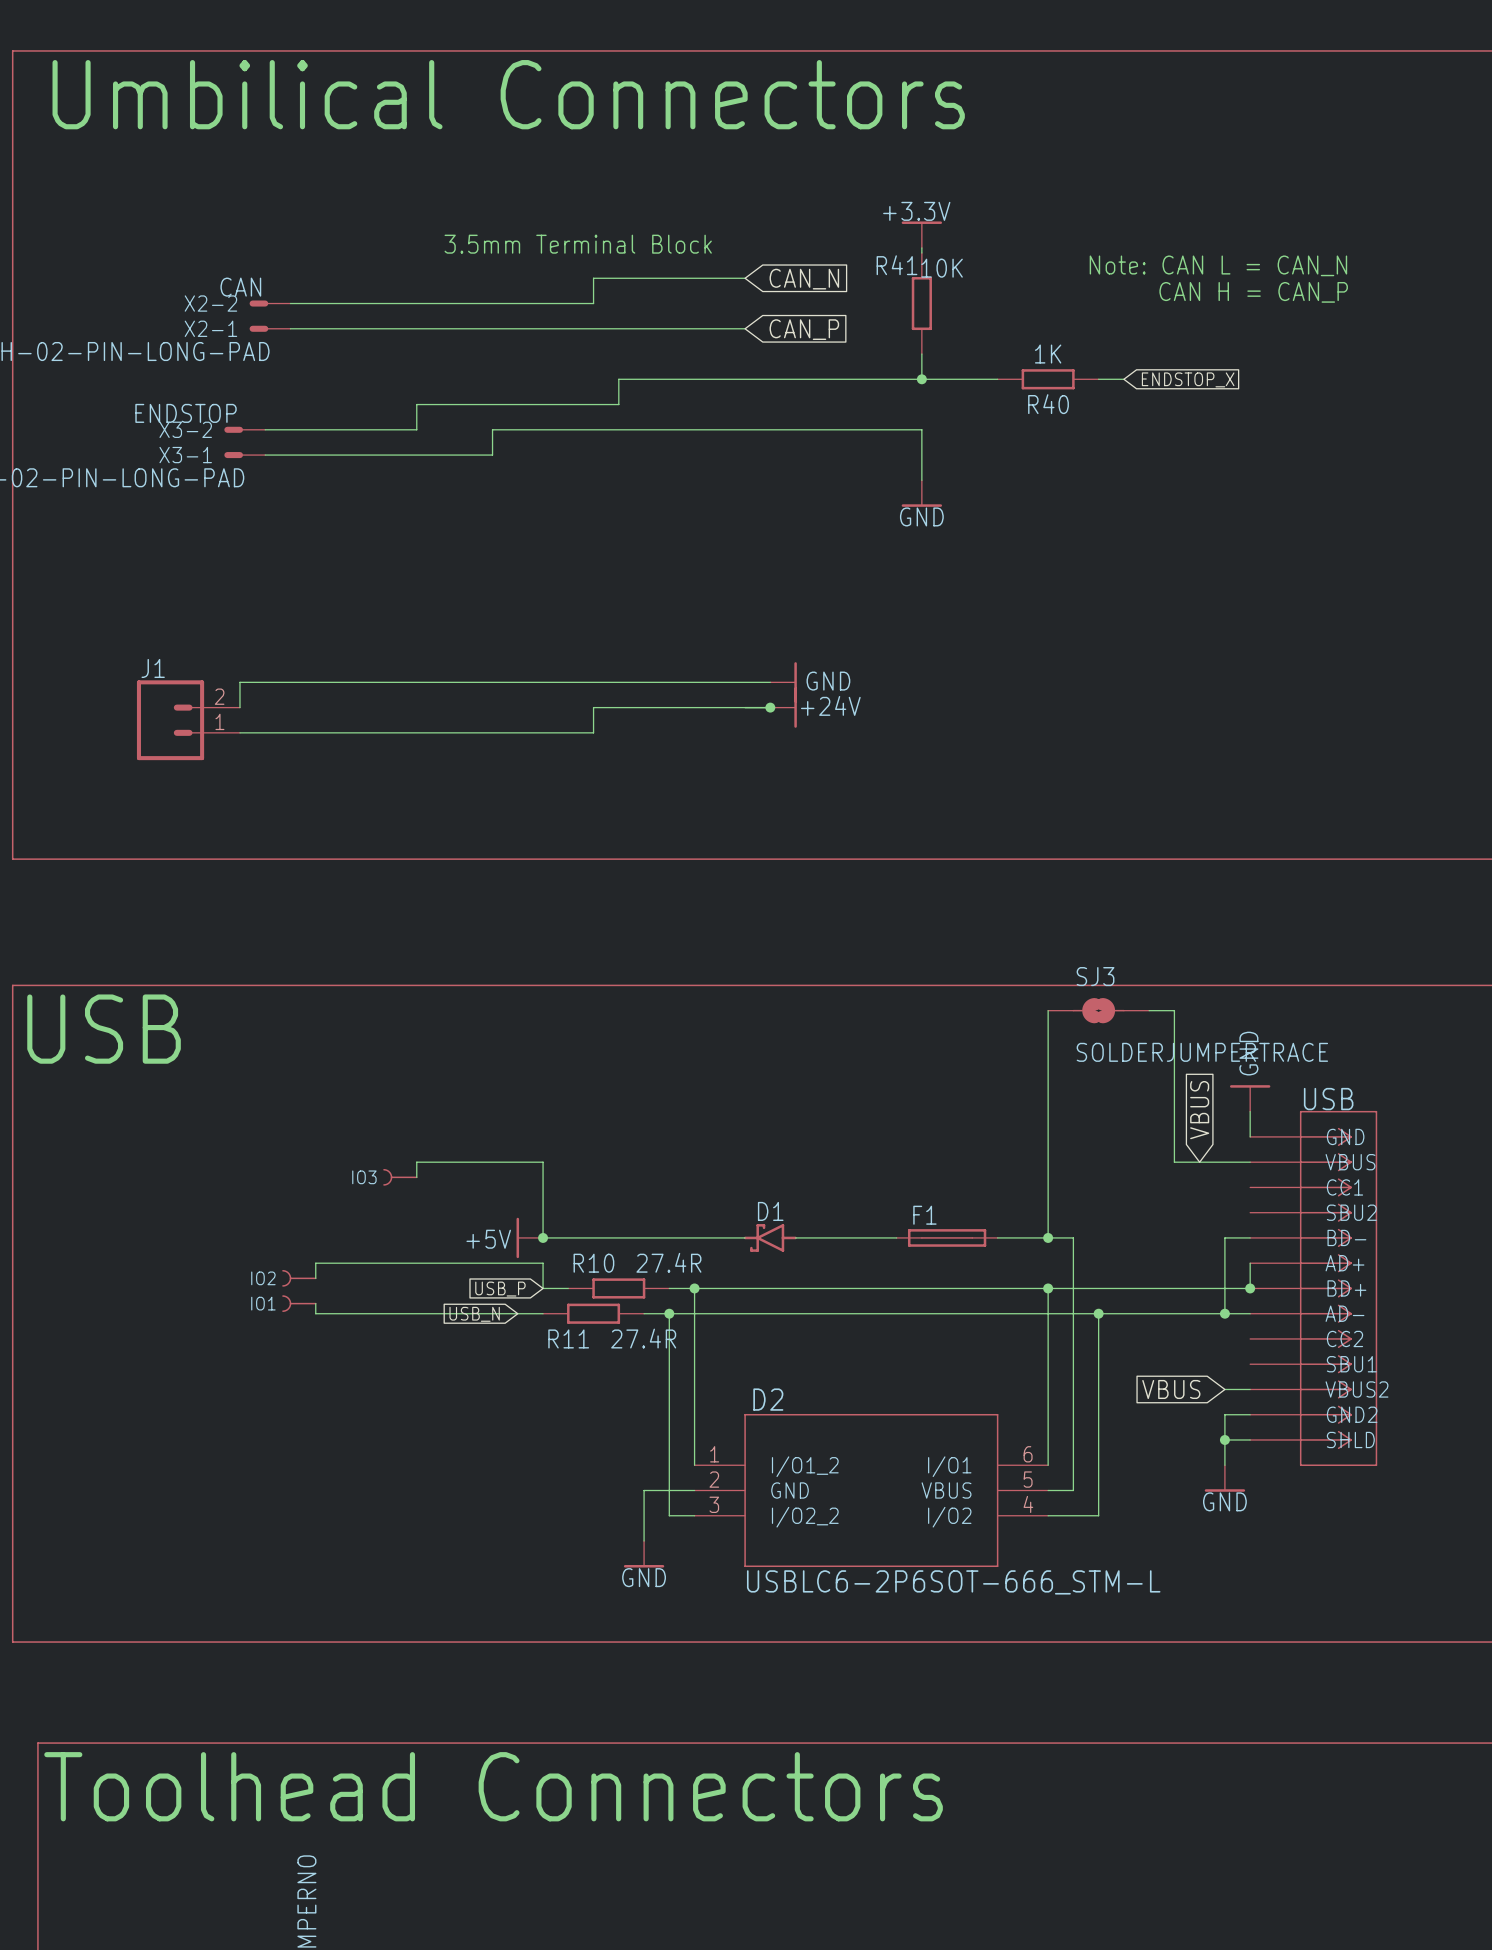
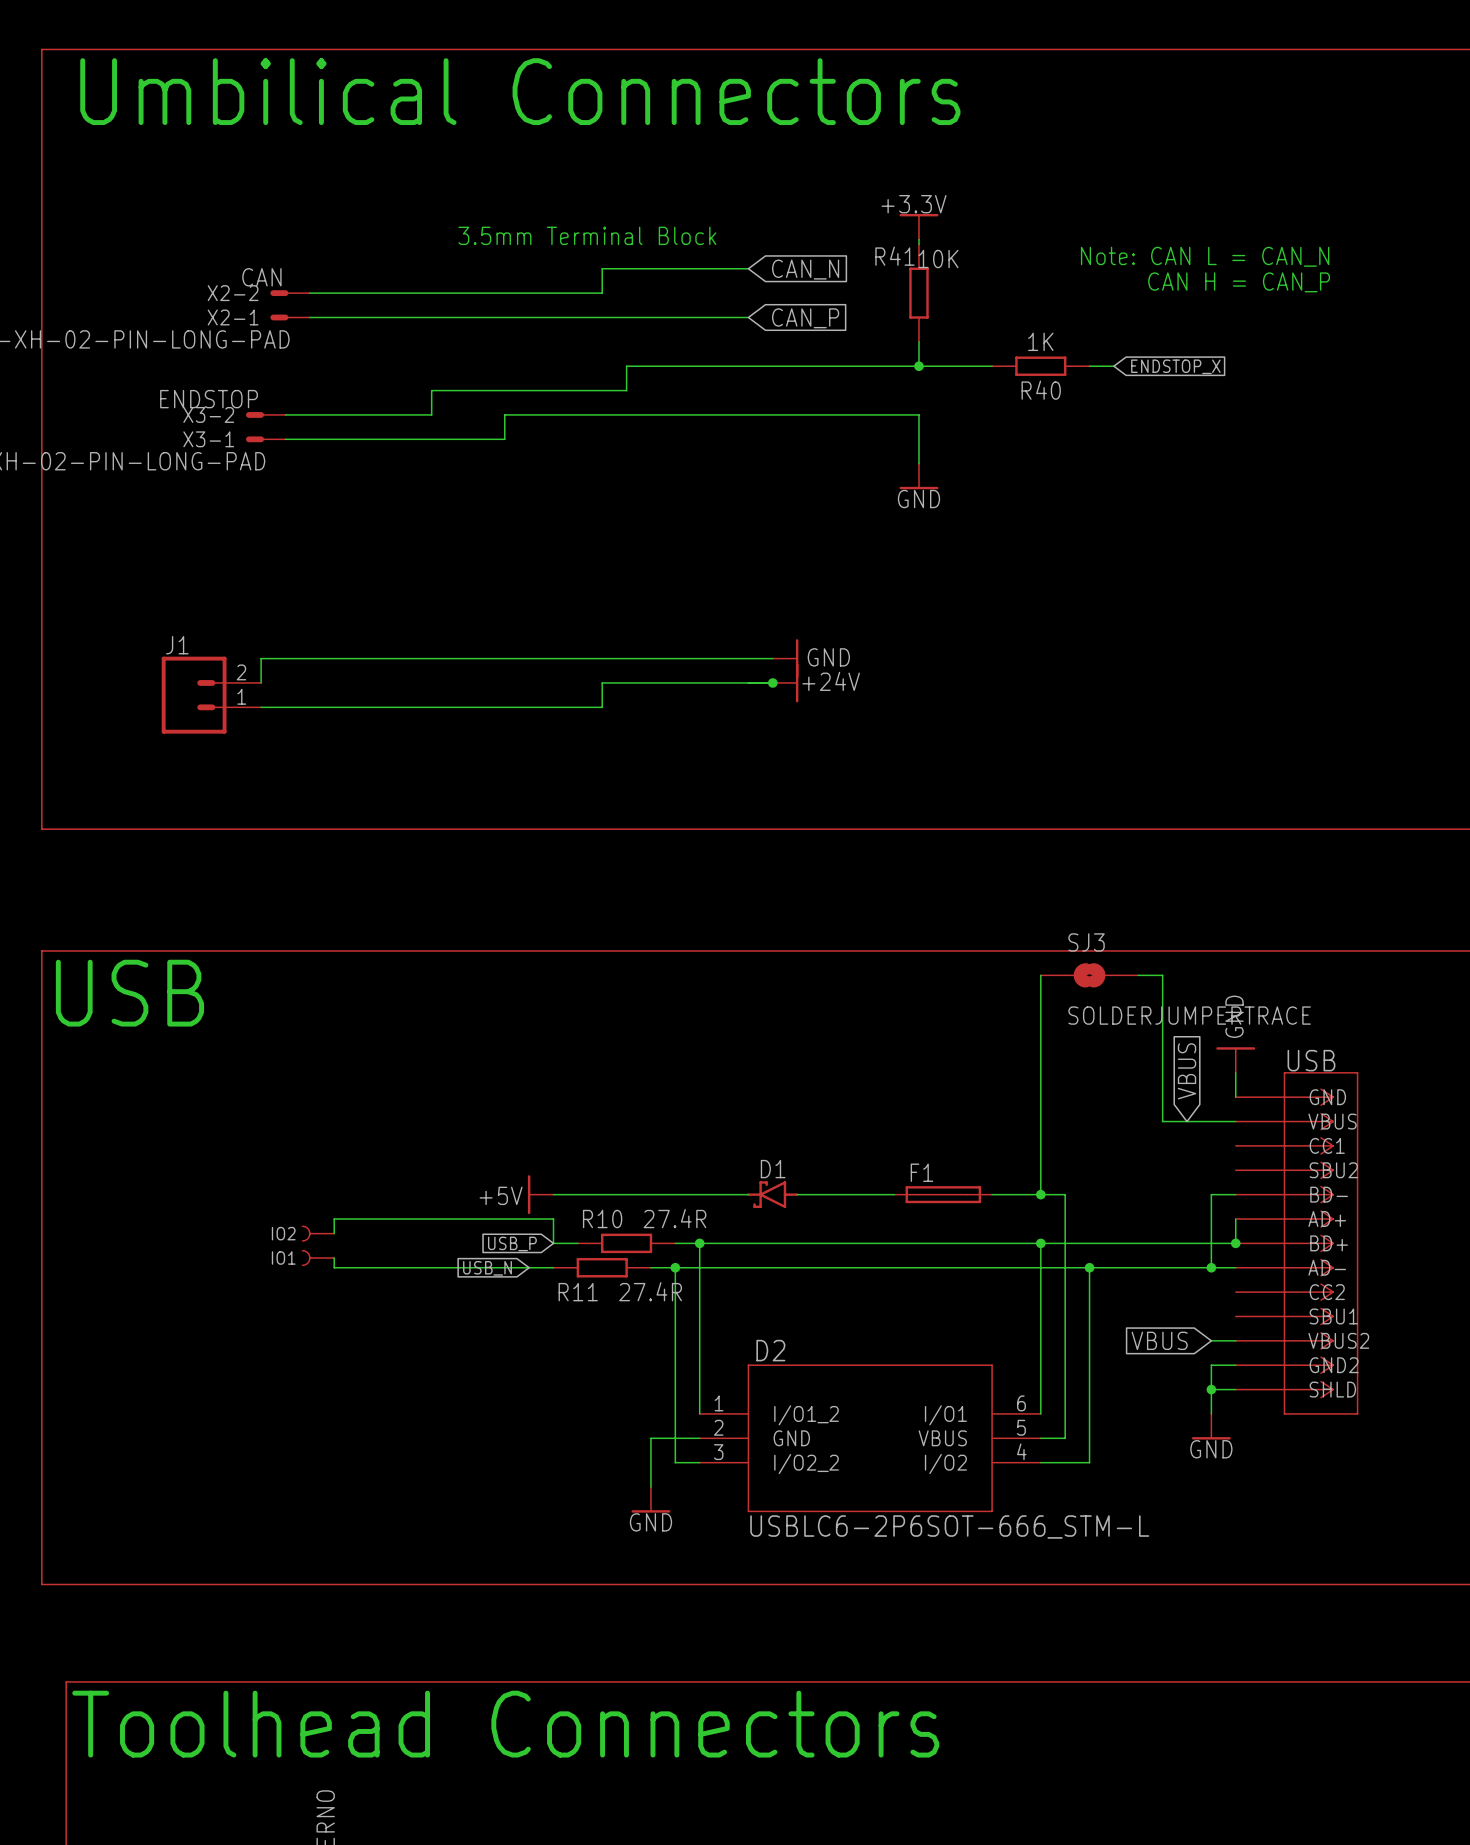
IO3: (400, 1177) -> none
wire: (416, 1177) (416, 1162) (543, 1162) (543, 1237) -> none
junction: (543, 1237) -> none

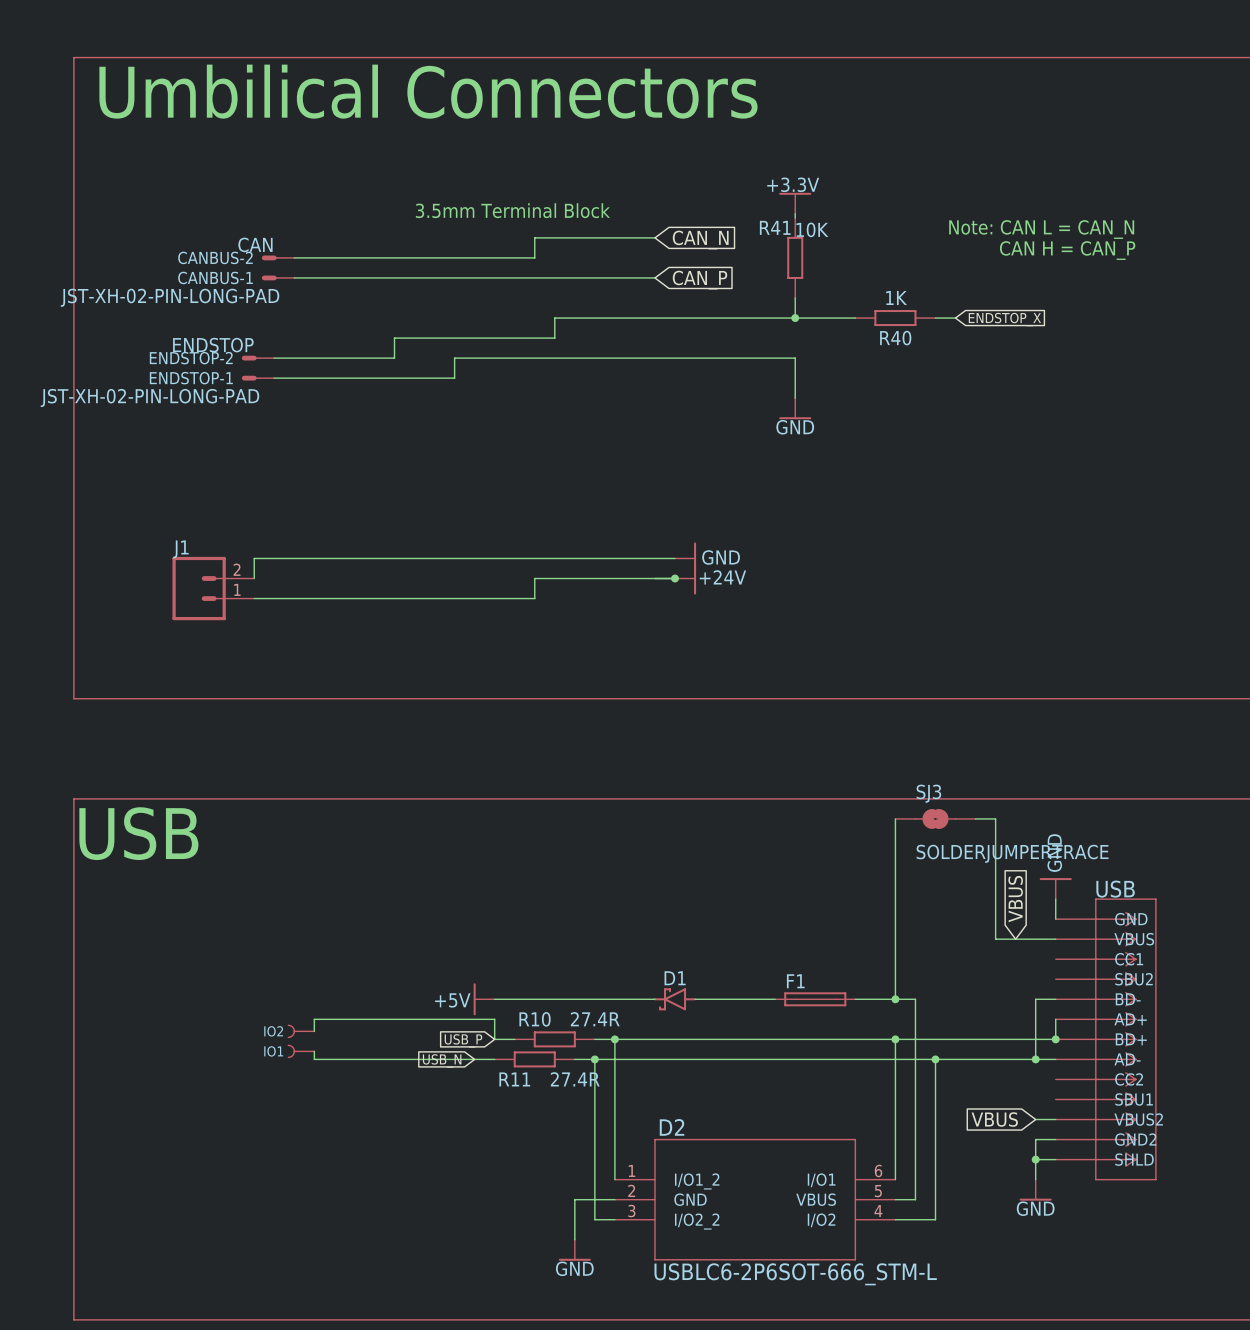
X2-2 name: X2-2 (233, 293) -> CANBUS-2 (215, 257)
X2-1 name: X2-1 (233, 317) -> CANBUS-1 (215, 277)
X3-2 name: X3-2 (208, 414) -> ENDSTOP-2 (191, 358)
X3-1 name: X3-1 (208, 439) -> ENDSTOP-1 (191, 378)

